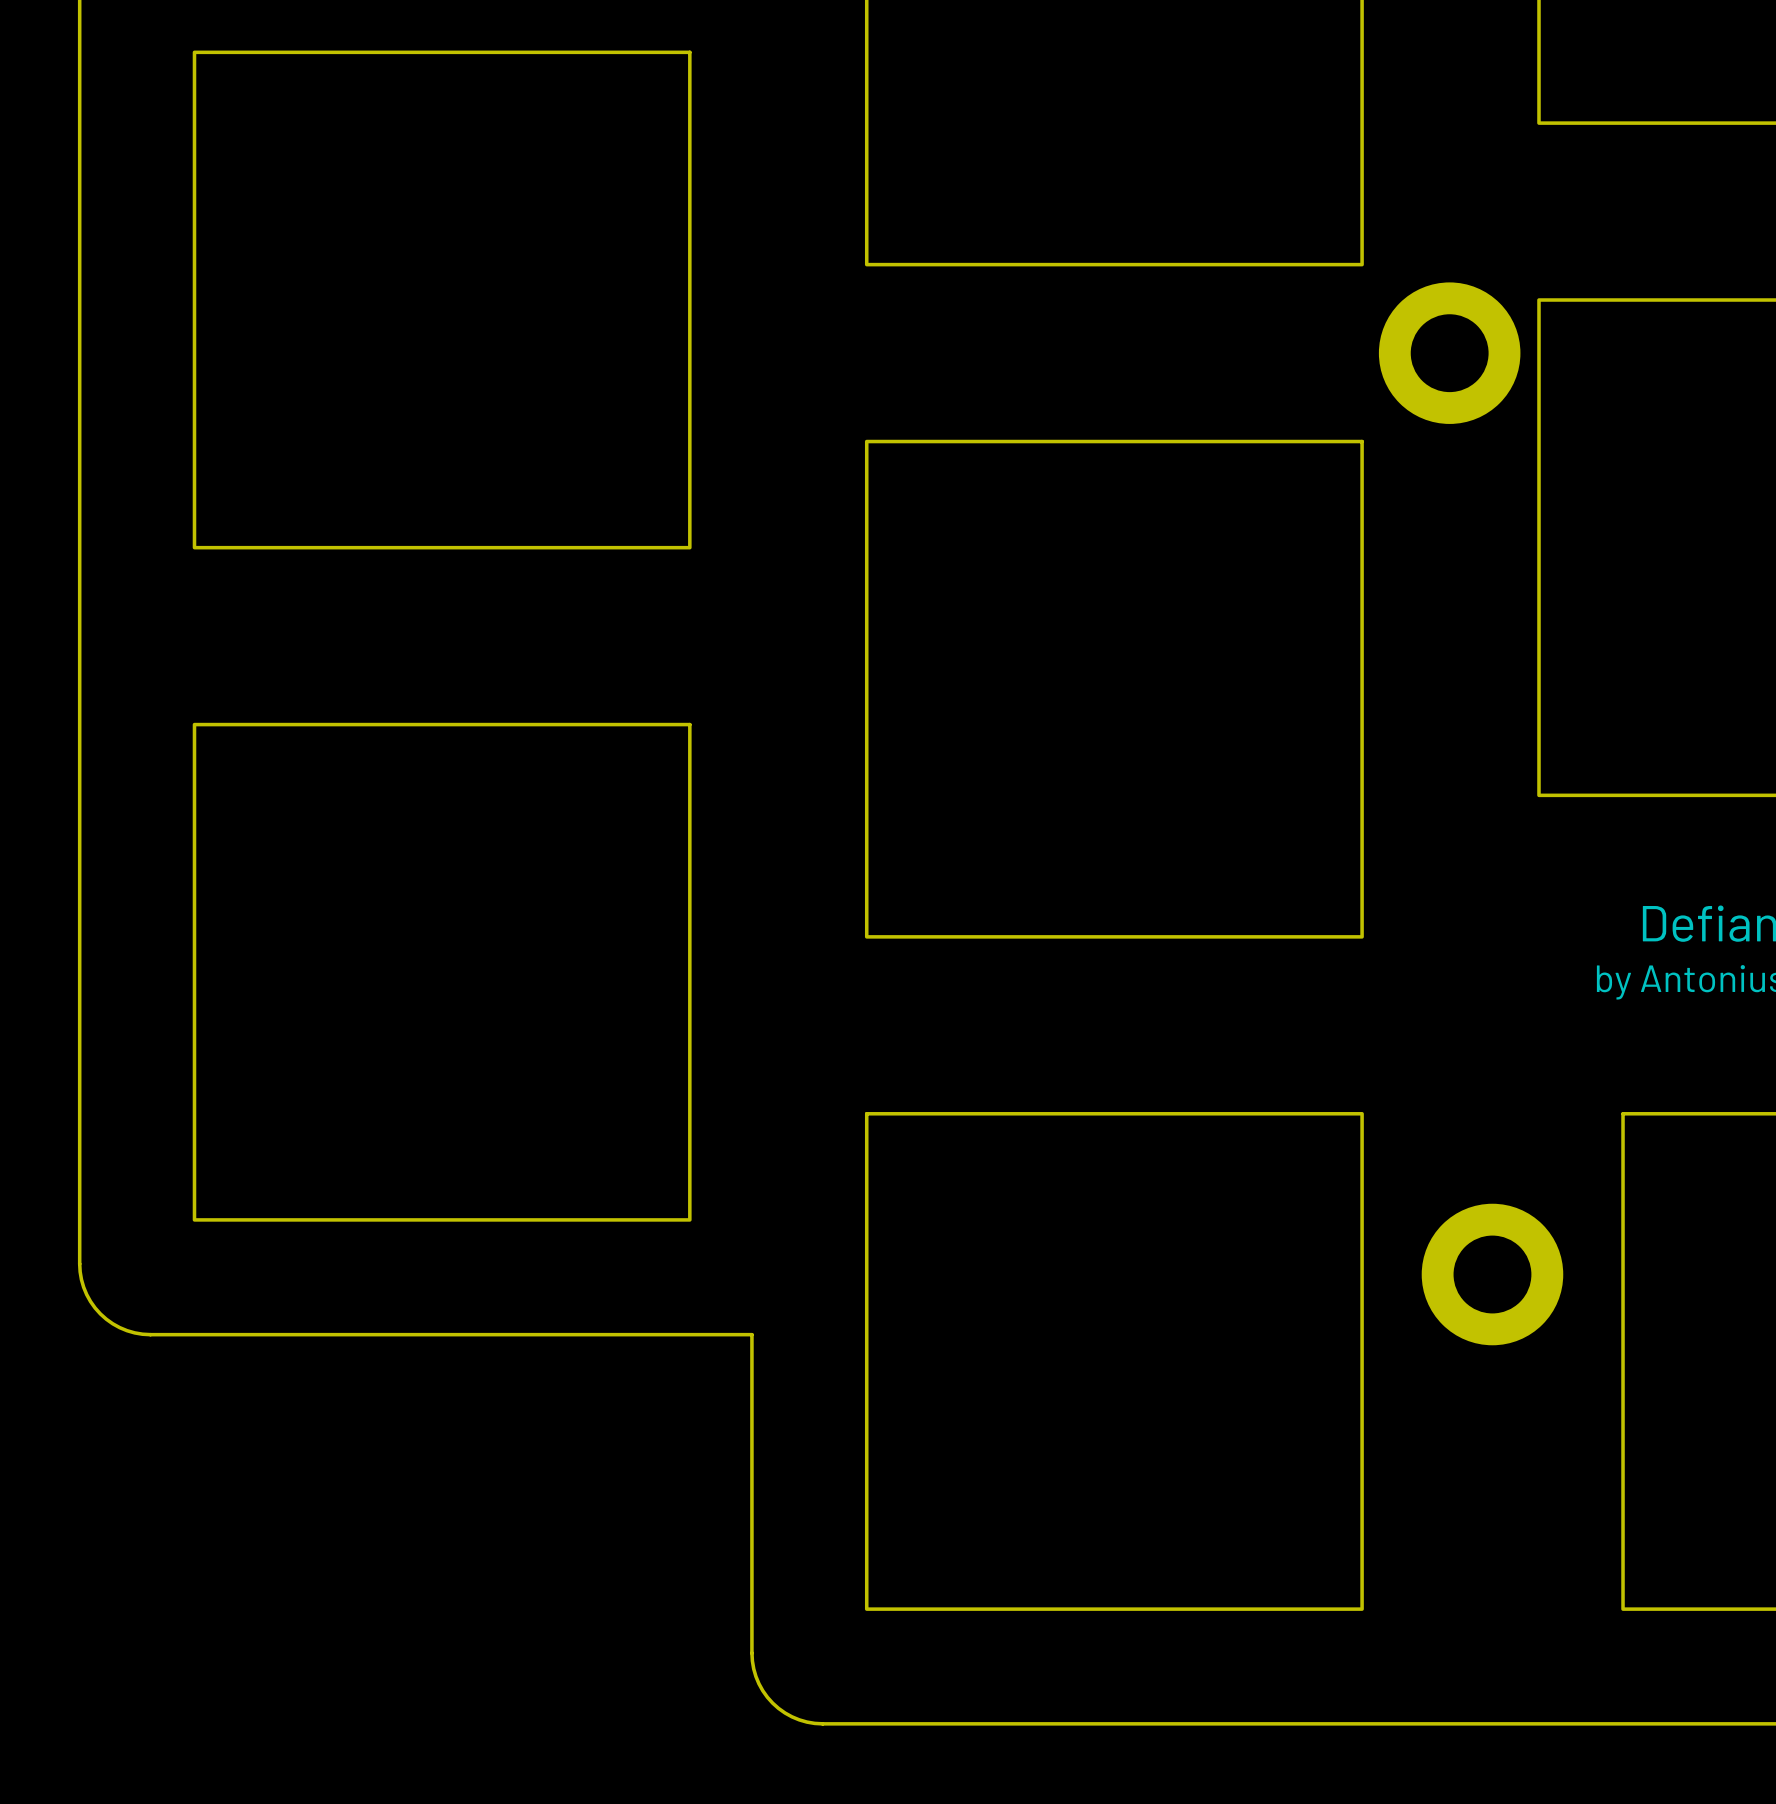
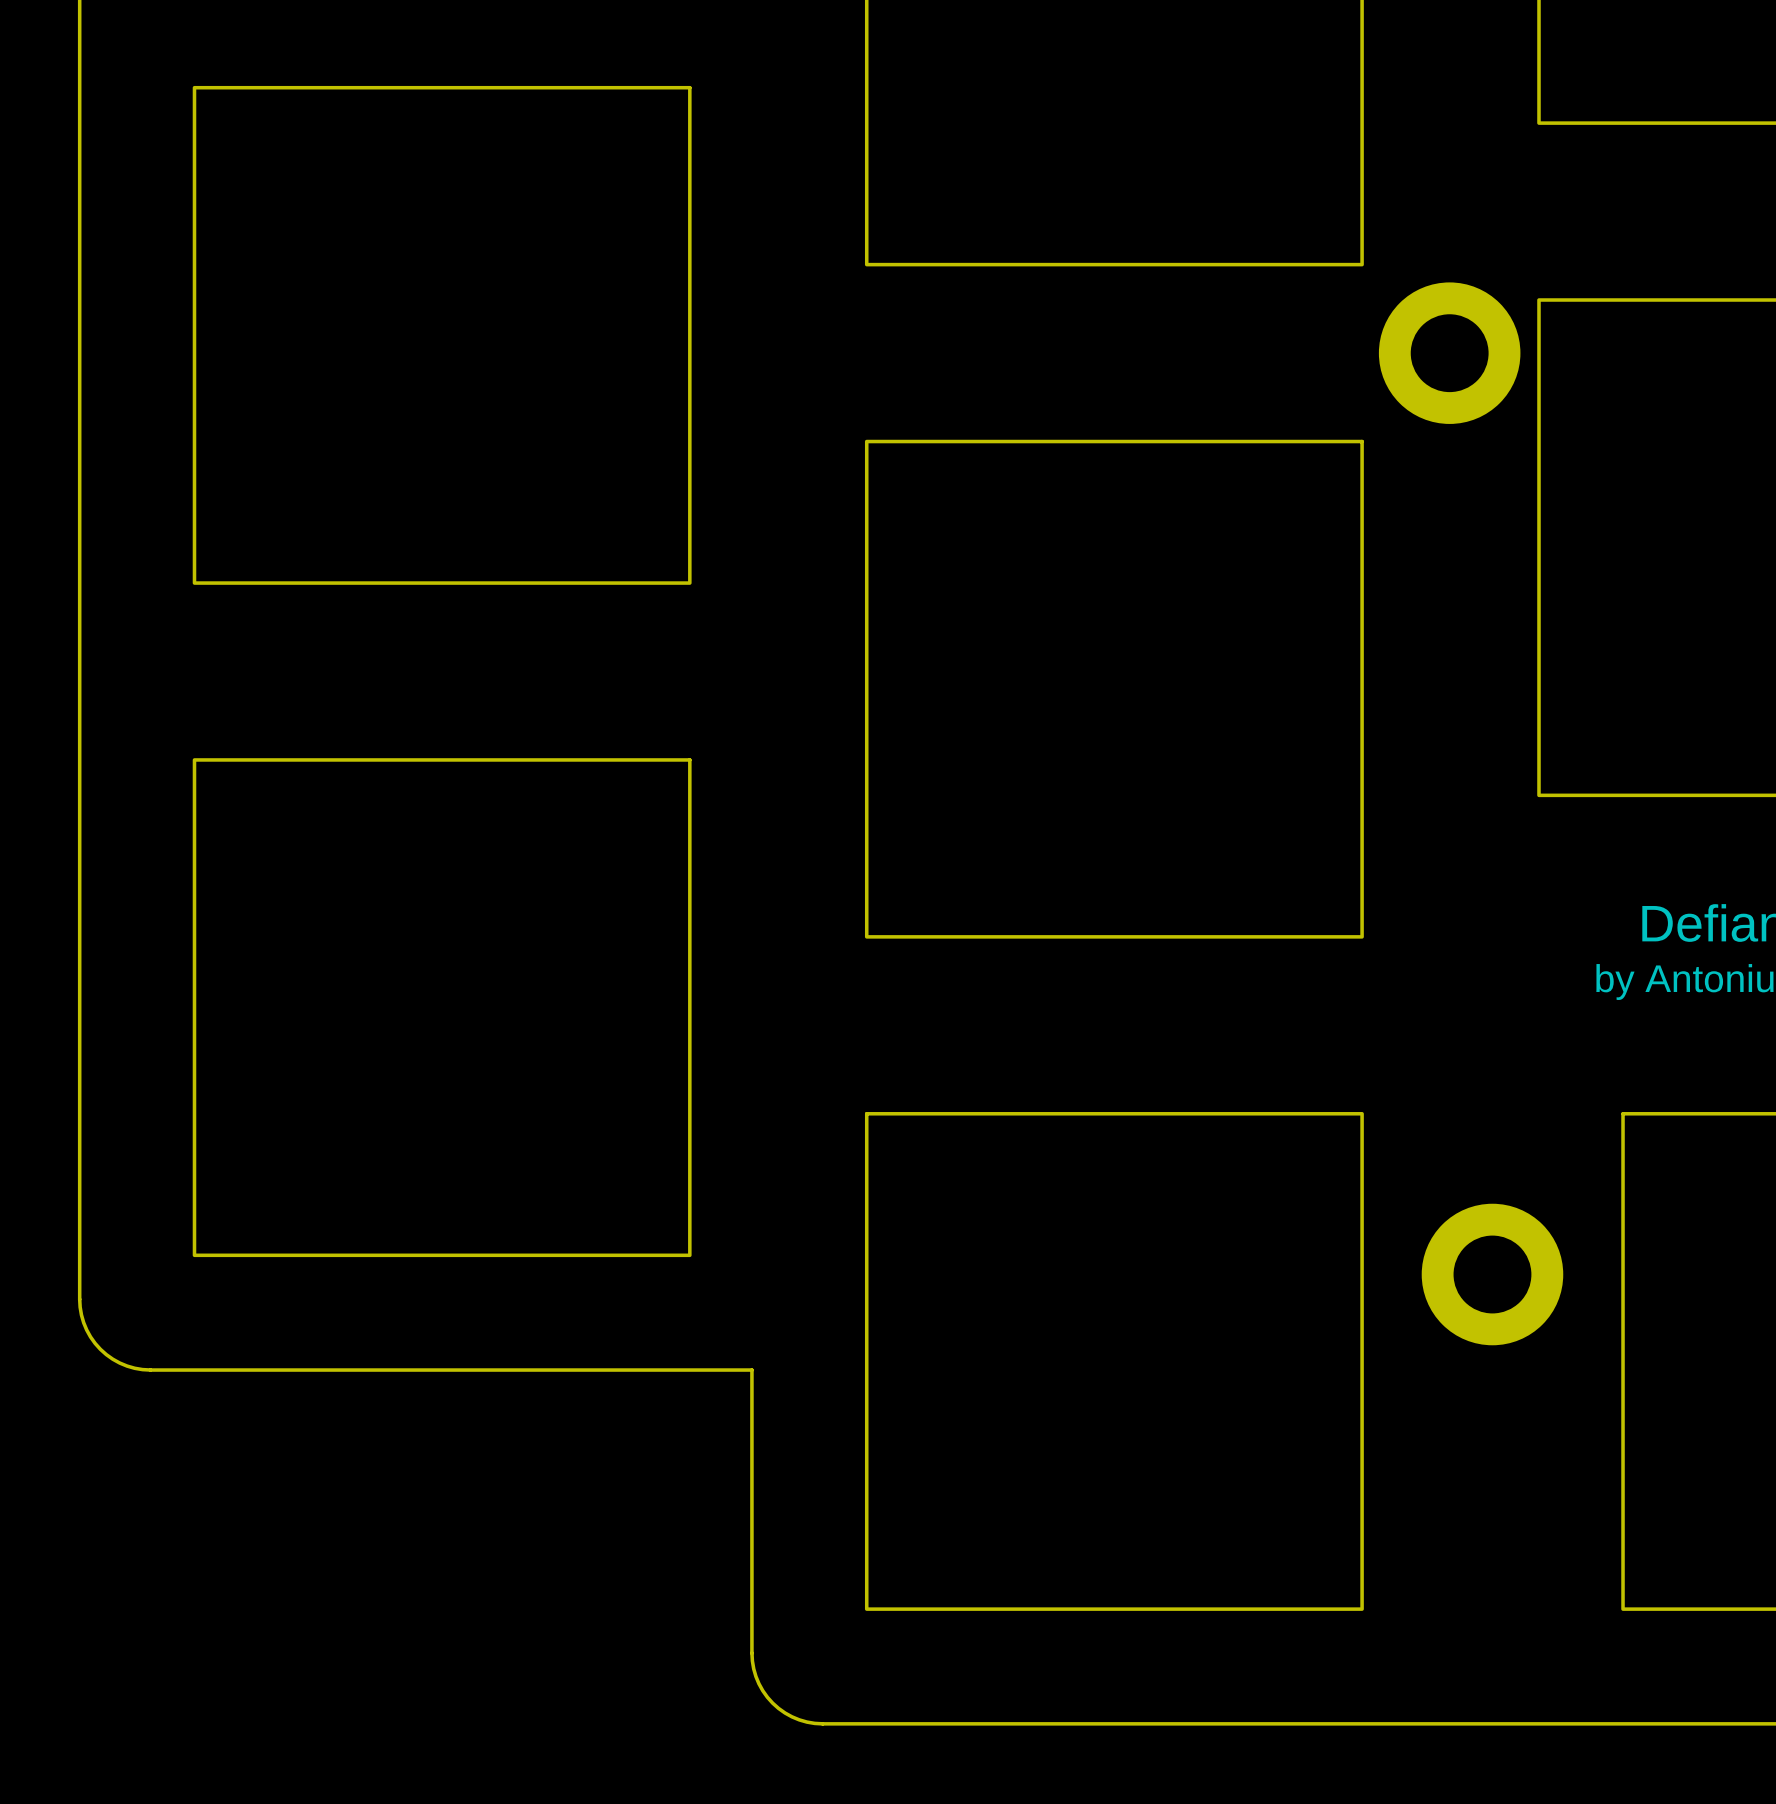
drawing position: (442, 300) -> (442, 335)
drawing position: (442, 972) -> (442, 1007)
board edge: (79, 1263) (81, 1279) (86, 1294) (100, 1313) (119, 1327) (142, 1334) (751, 1334) (751, 1370) -> (79, 1263) (80, 1307) (83, 1322) (90, 1336) (100, 1349) (112, 1359) (127, 1366) (142, 1369) (751, 1370)

